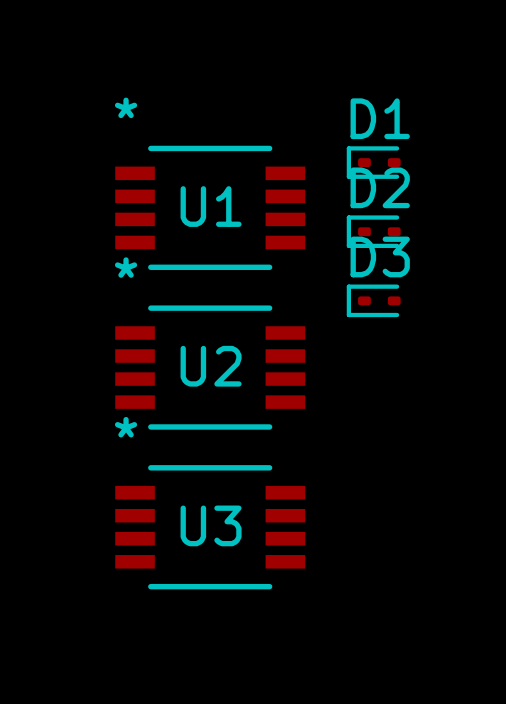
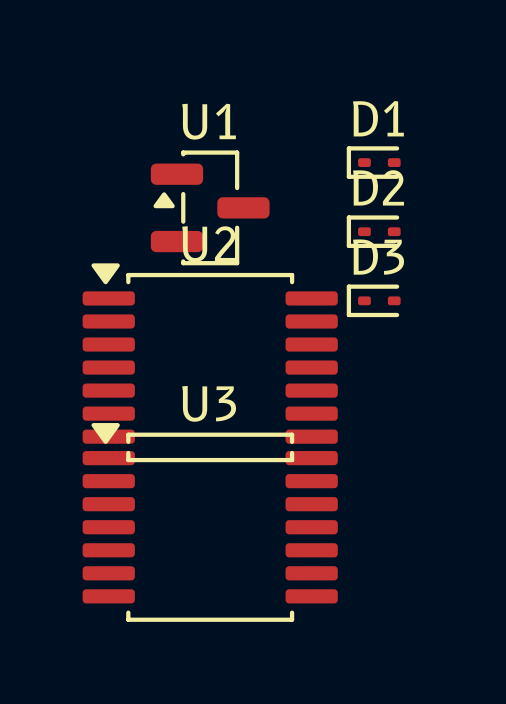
U1 footprint: [115, 145, 306, 270] -> [150, 150, 270, 266]
U1 name position: U1 (211, 206) -> U1 (209, 121)
U2 footprint: [115, 305, 306, 430] -> [82, 263, 338, 463]
U2 name position: U2 (211, 366) -> U2 (209, 244)
U3 footprint: [115, 465, 306, 590] -> [82, 423, 338, 622]
U3 name position: U3 (211, 525) -> U3 (209, 403)

